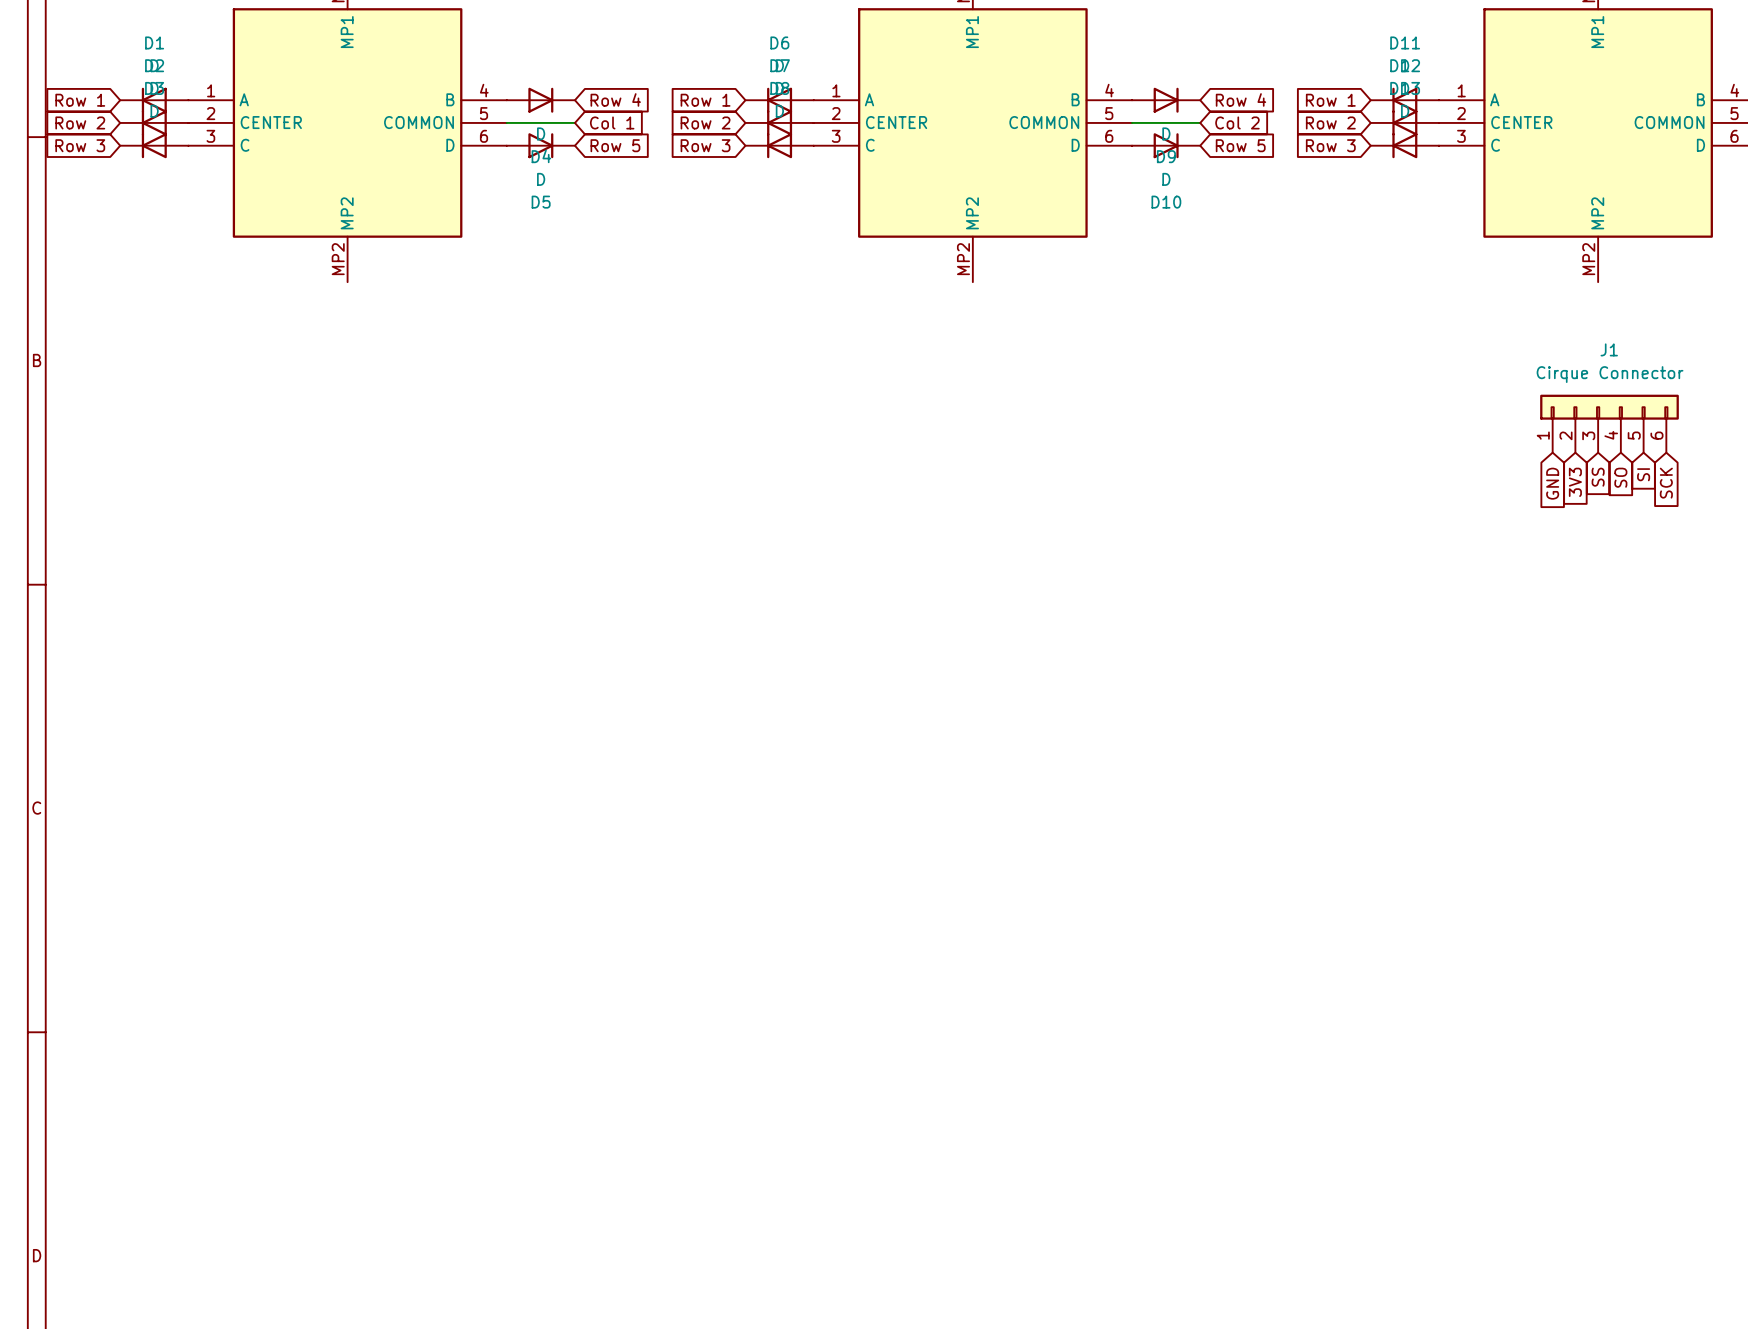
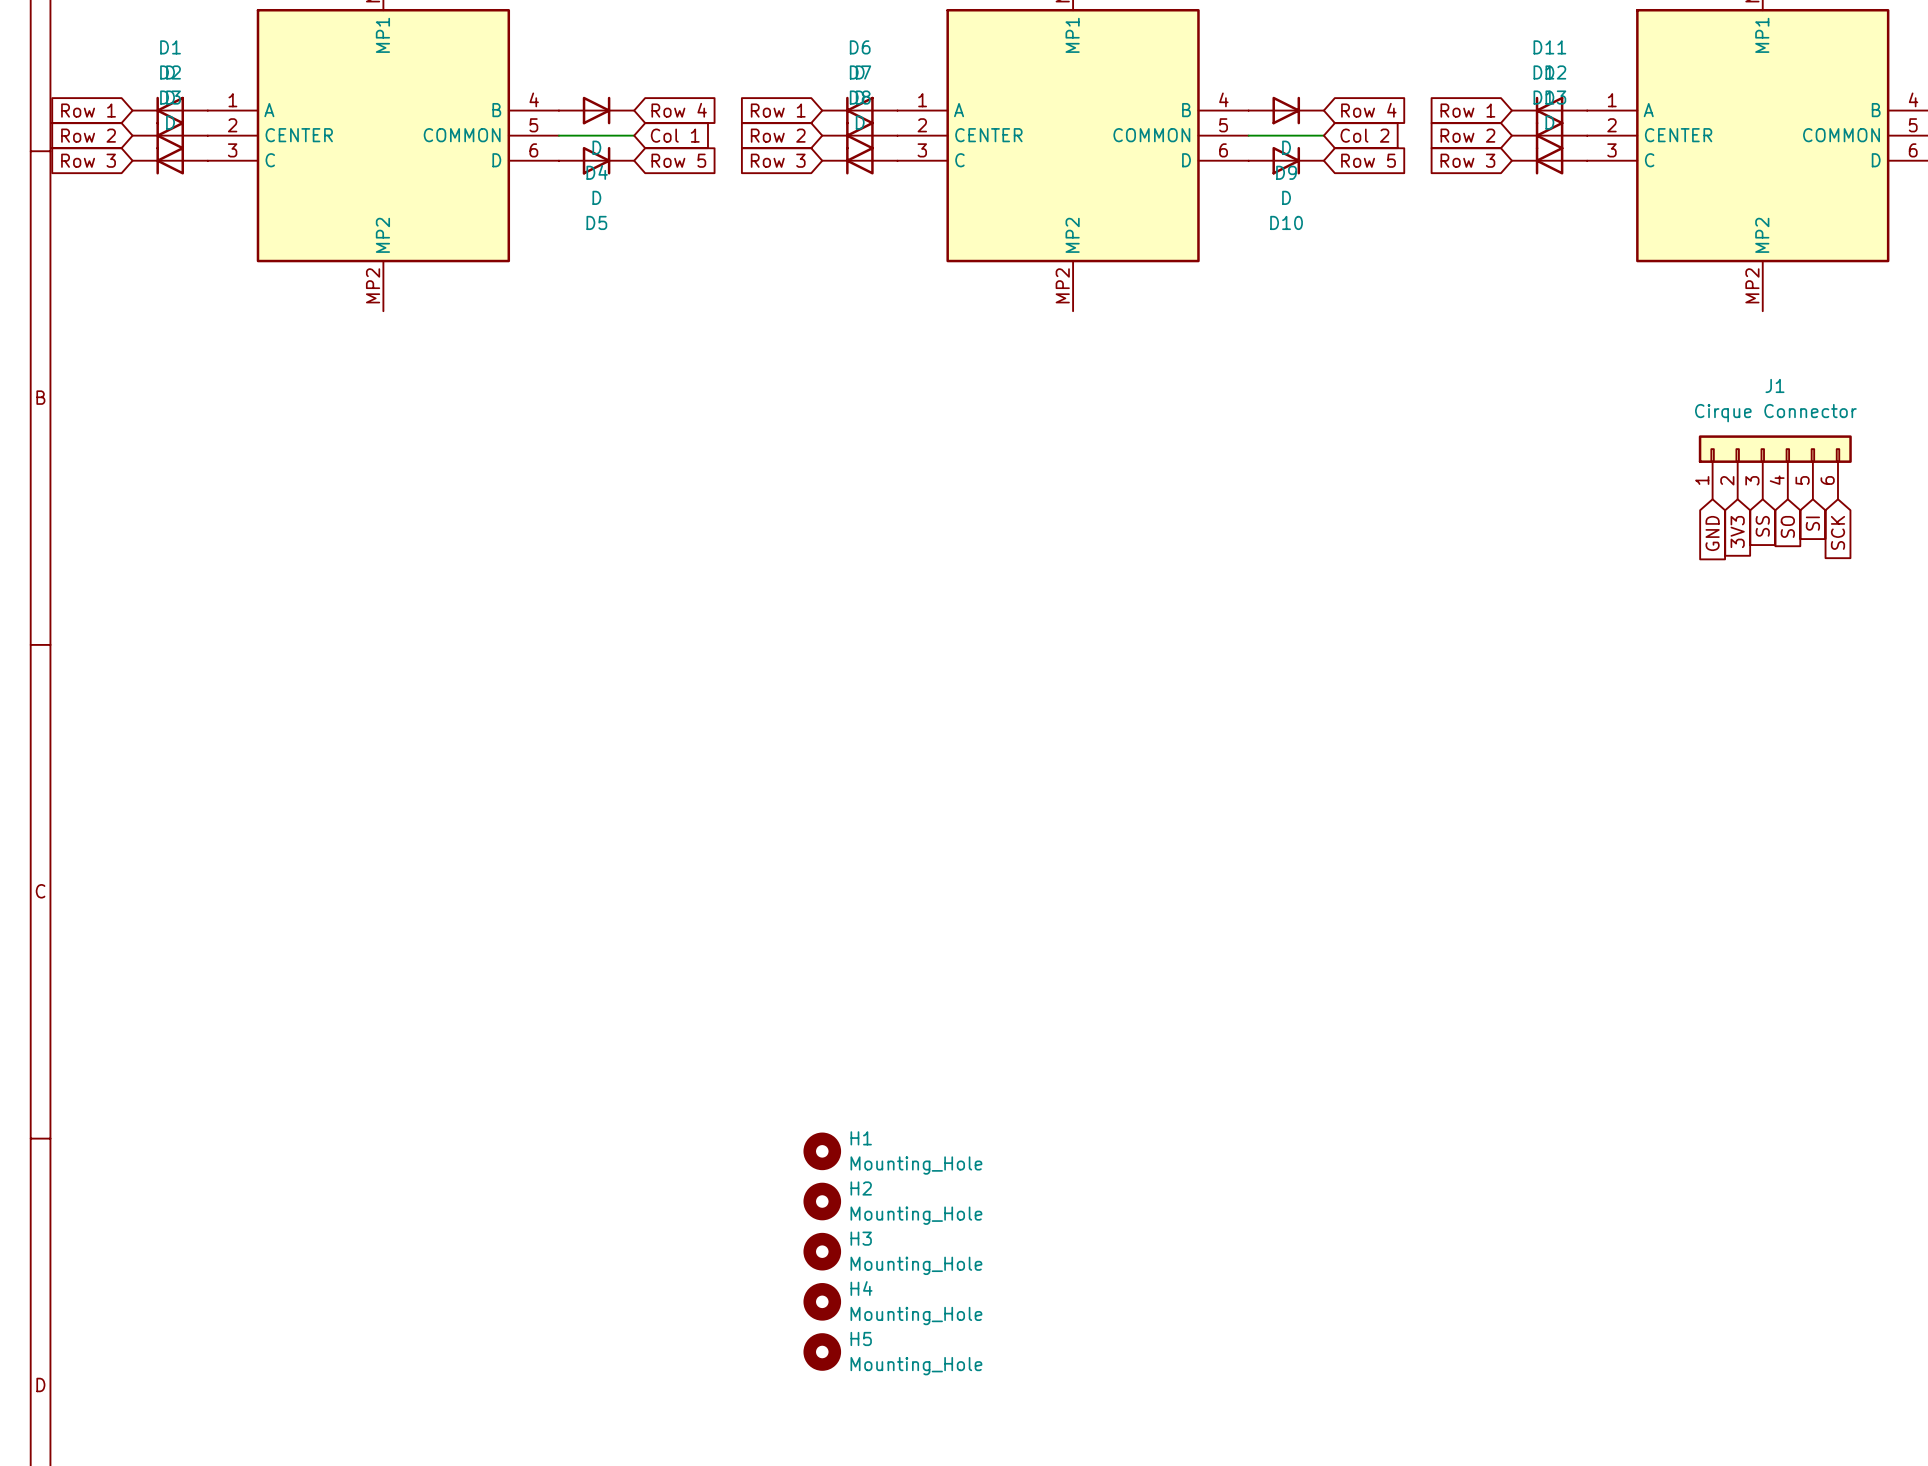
H1: none -> Mounting_Hole (822, 1151)
H2: none -> Mounting_Hole (822, 1201)
H3: none -> Mounting_Hole (822, 1251)
H4: none -> Mounting_Hole (822, 1301)
H5: none -> Mounting_Hole (822, 1351)

